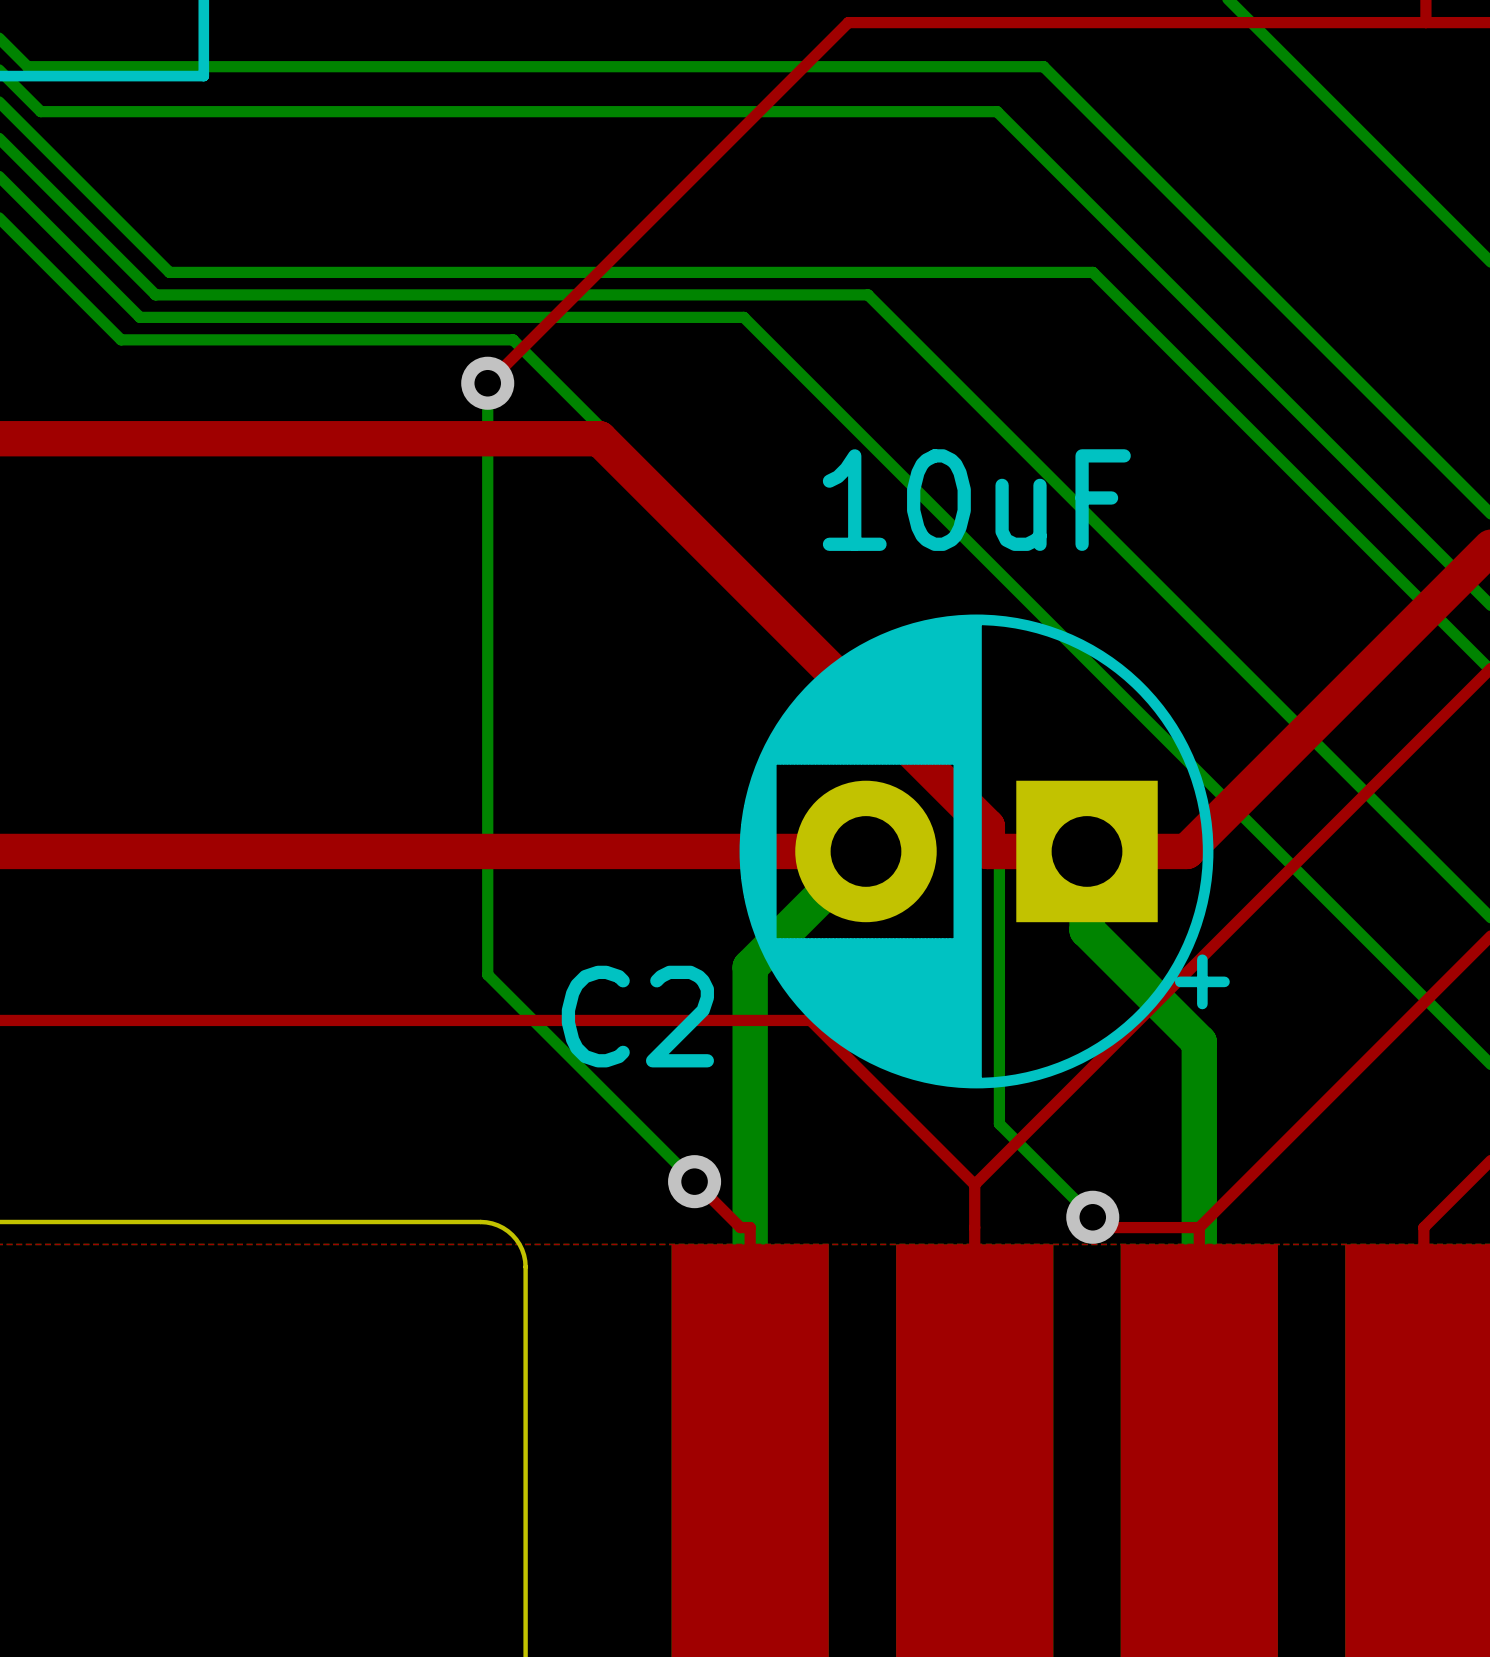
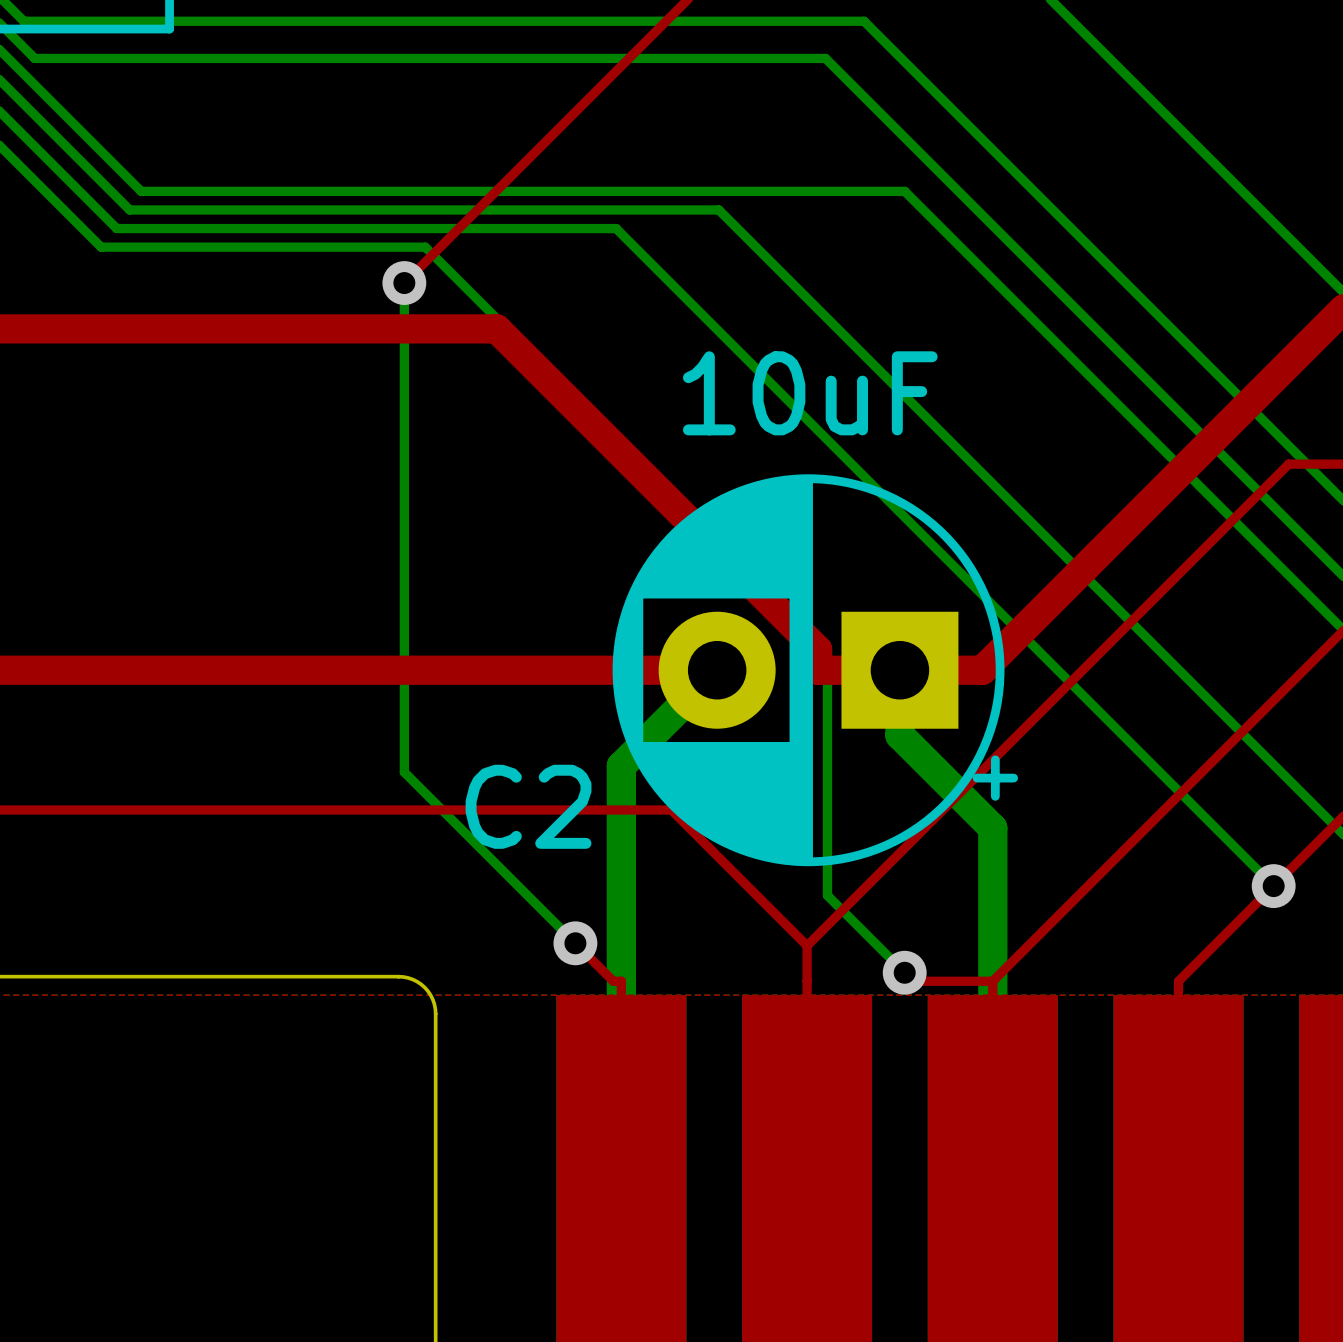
text: 10uF (976, 500) -> none
C2 value: none -> 10uF (810, 393)

